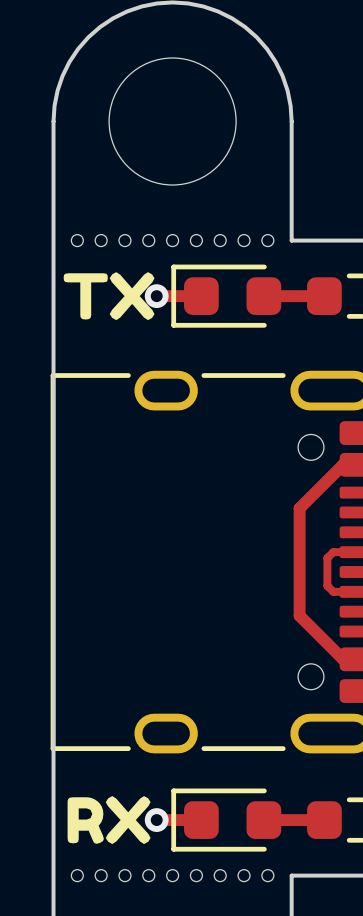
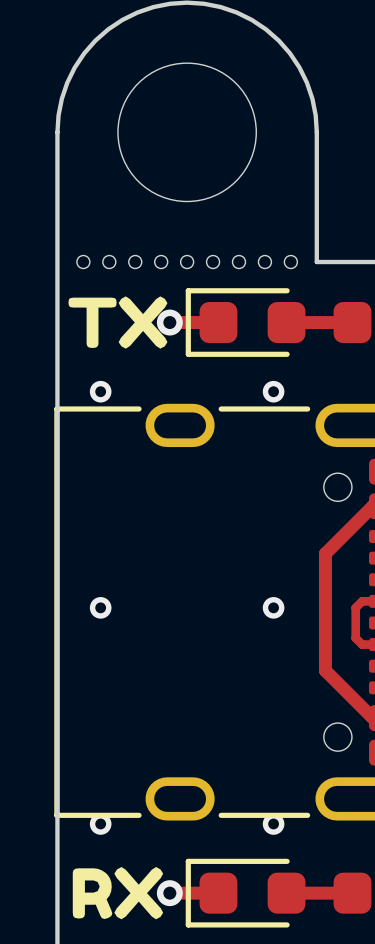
via: none -> (100, 391)
via: none -> (273, 391)
via: none -> (100, 607)
via: none -> (273, 607)
via: none -> (100, 823)
via: none -> (273, 823)

